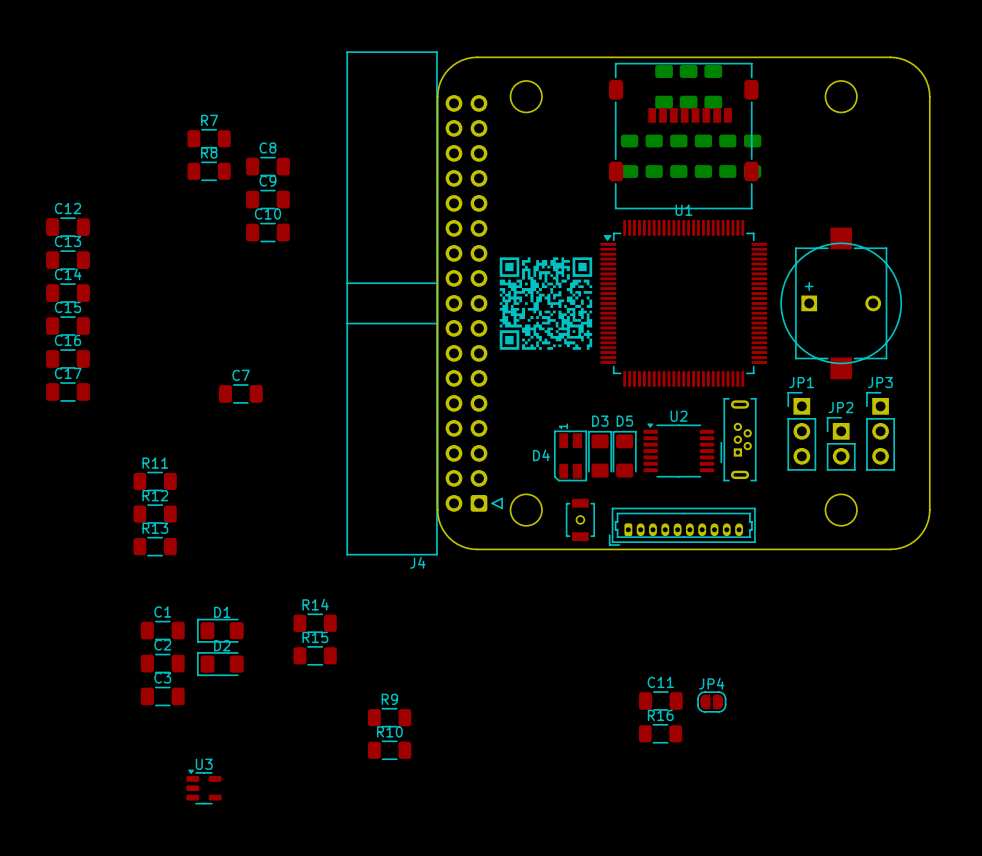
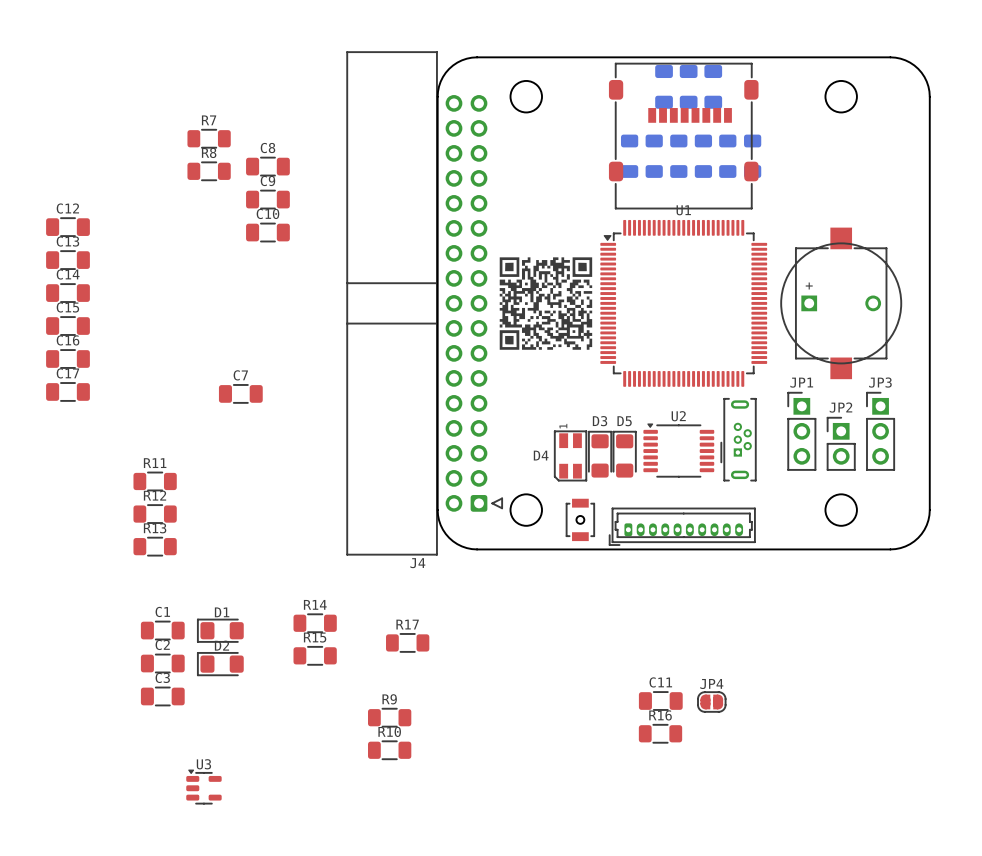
R17: none -> (407, 642)

